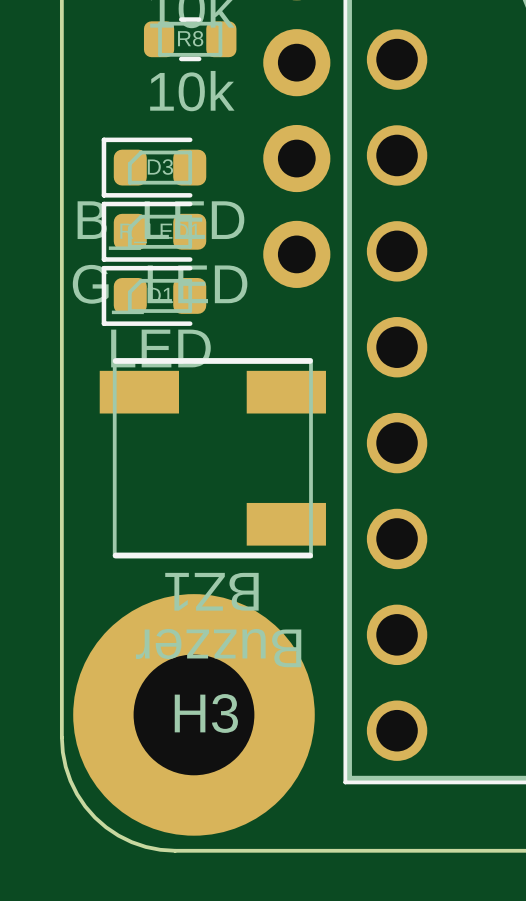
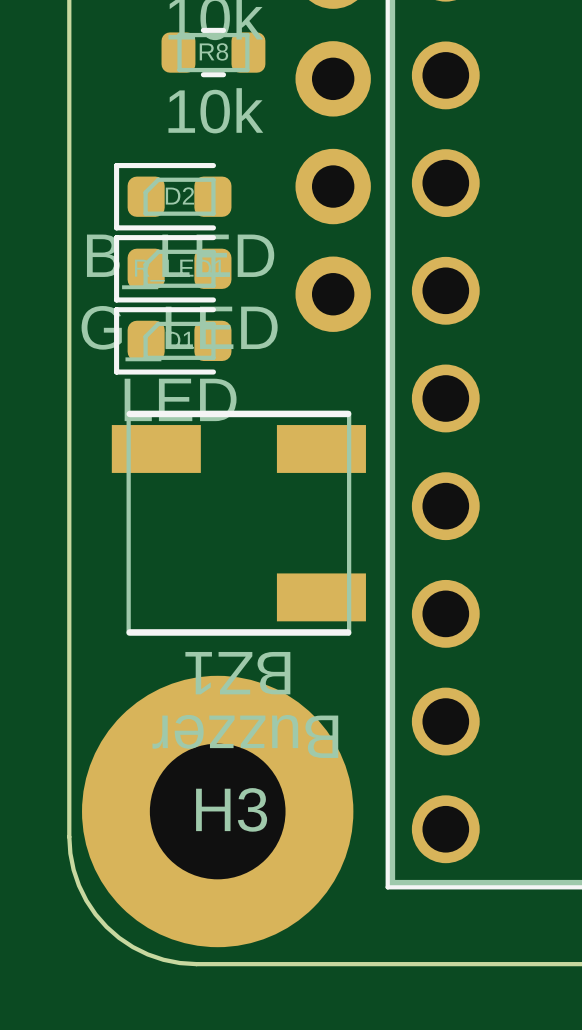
D3 name: D3 (160, 167) -> D2 (179, 195)

